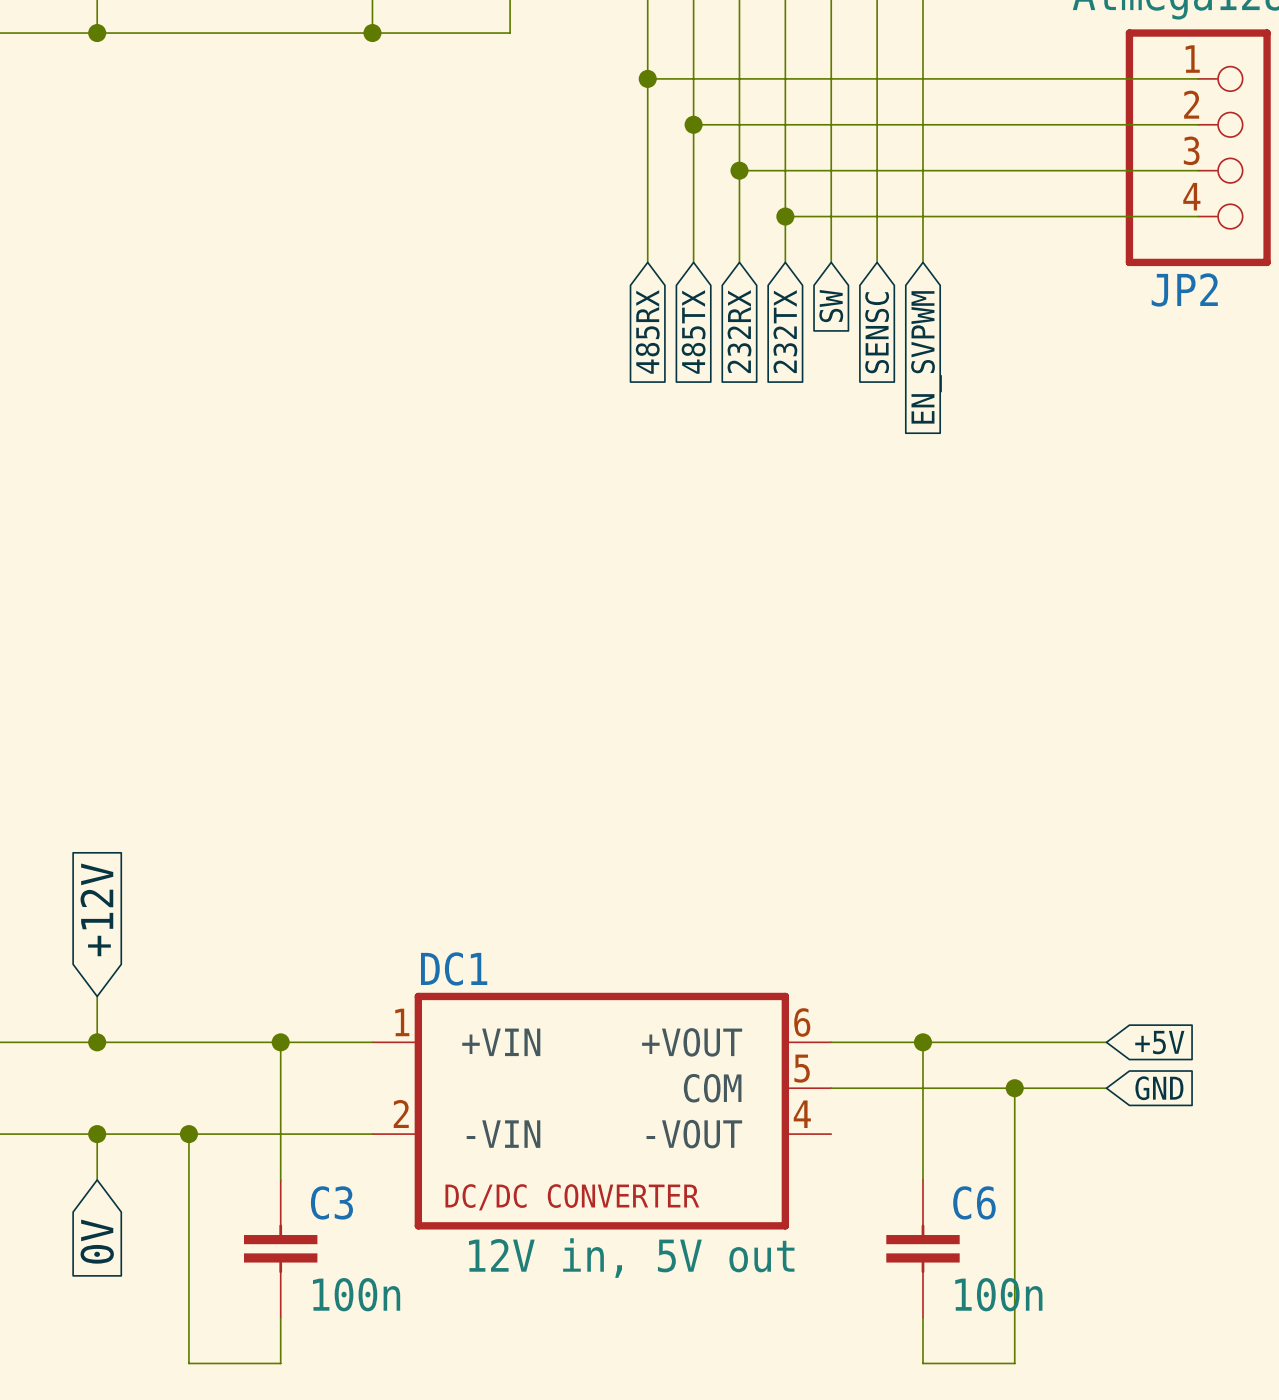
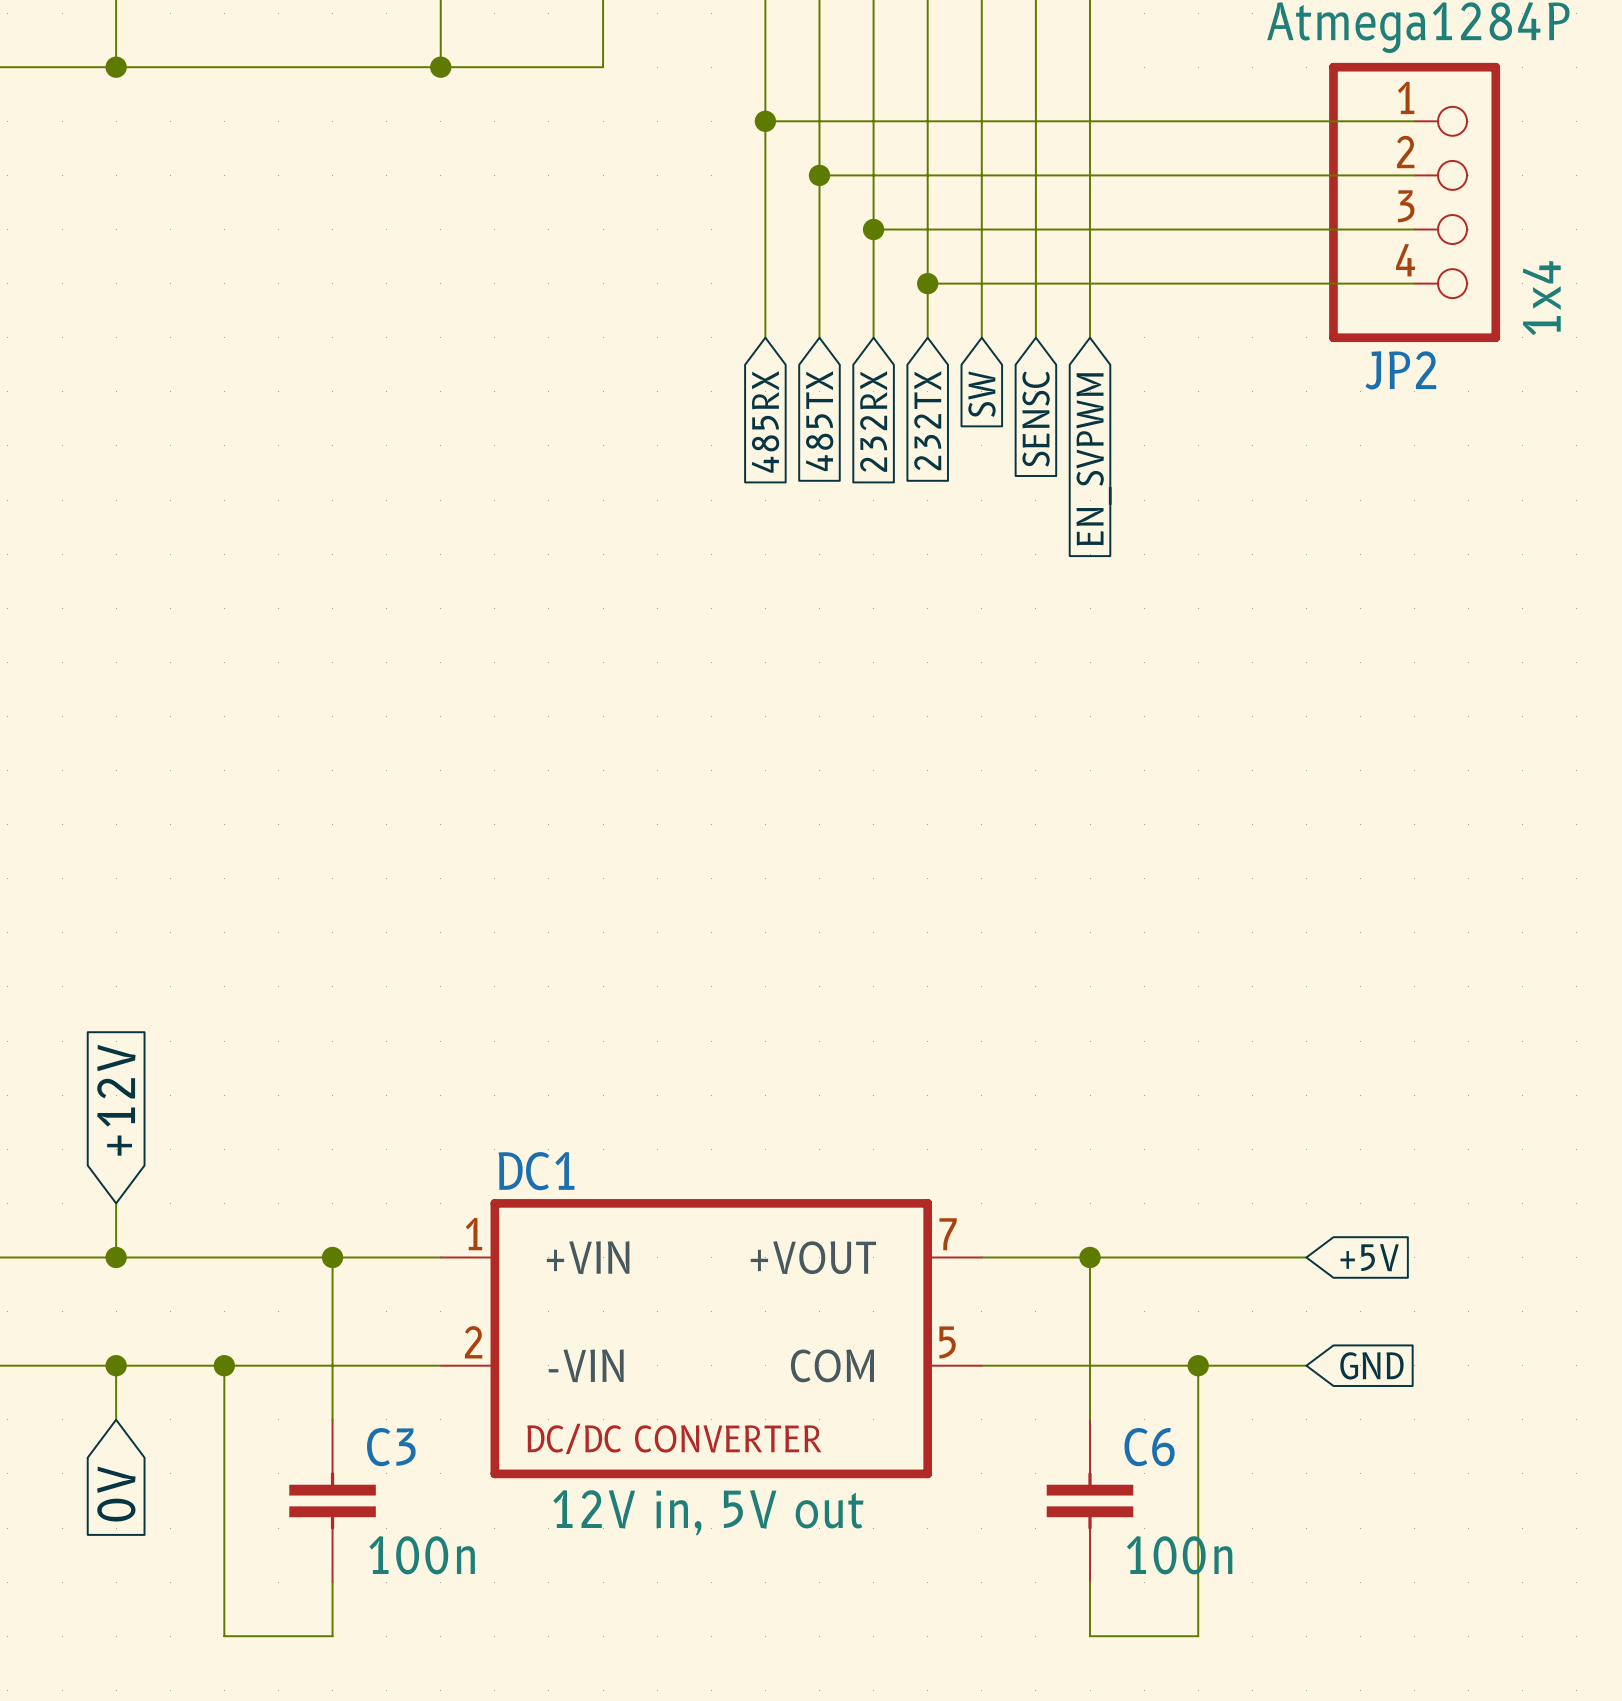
DC1 symbol: [372, 992, 832, 1230] -> [440, 1199, 982, 1479]
wire: (831, 1088) (1106, 1088) -> (981, 1365) (1306, 1365)
wire: (1014, 1088) (1014, 1134) -> none
junction position: (1014, 1088) -> (1198, 1365)
global label position: GND (1159, 1088) -> GND (1371, 1365)

